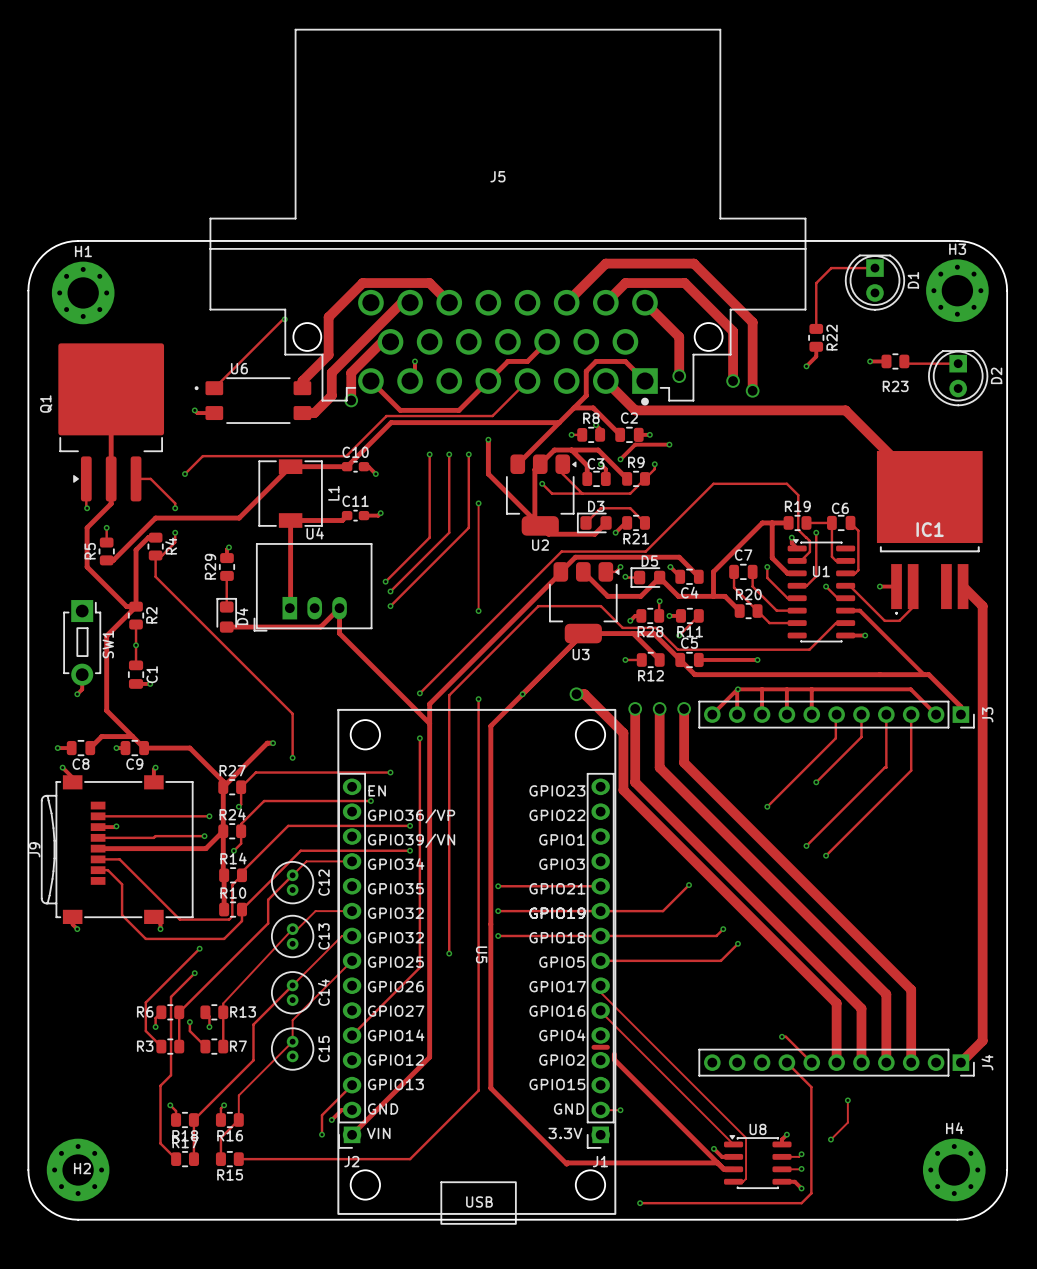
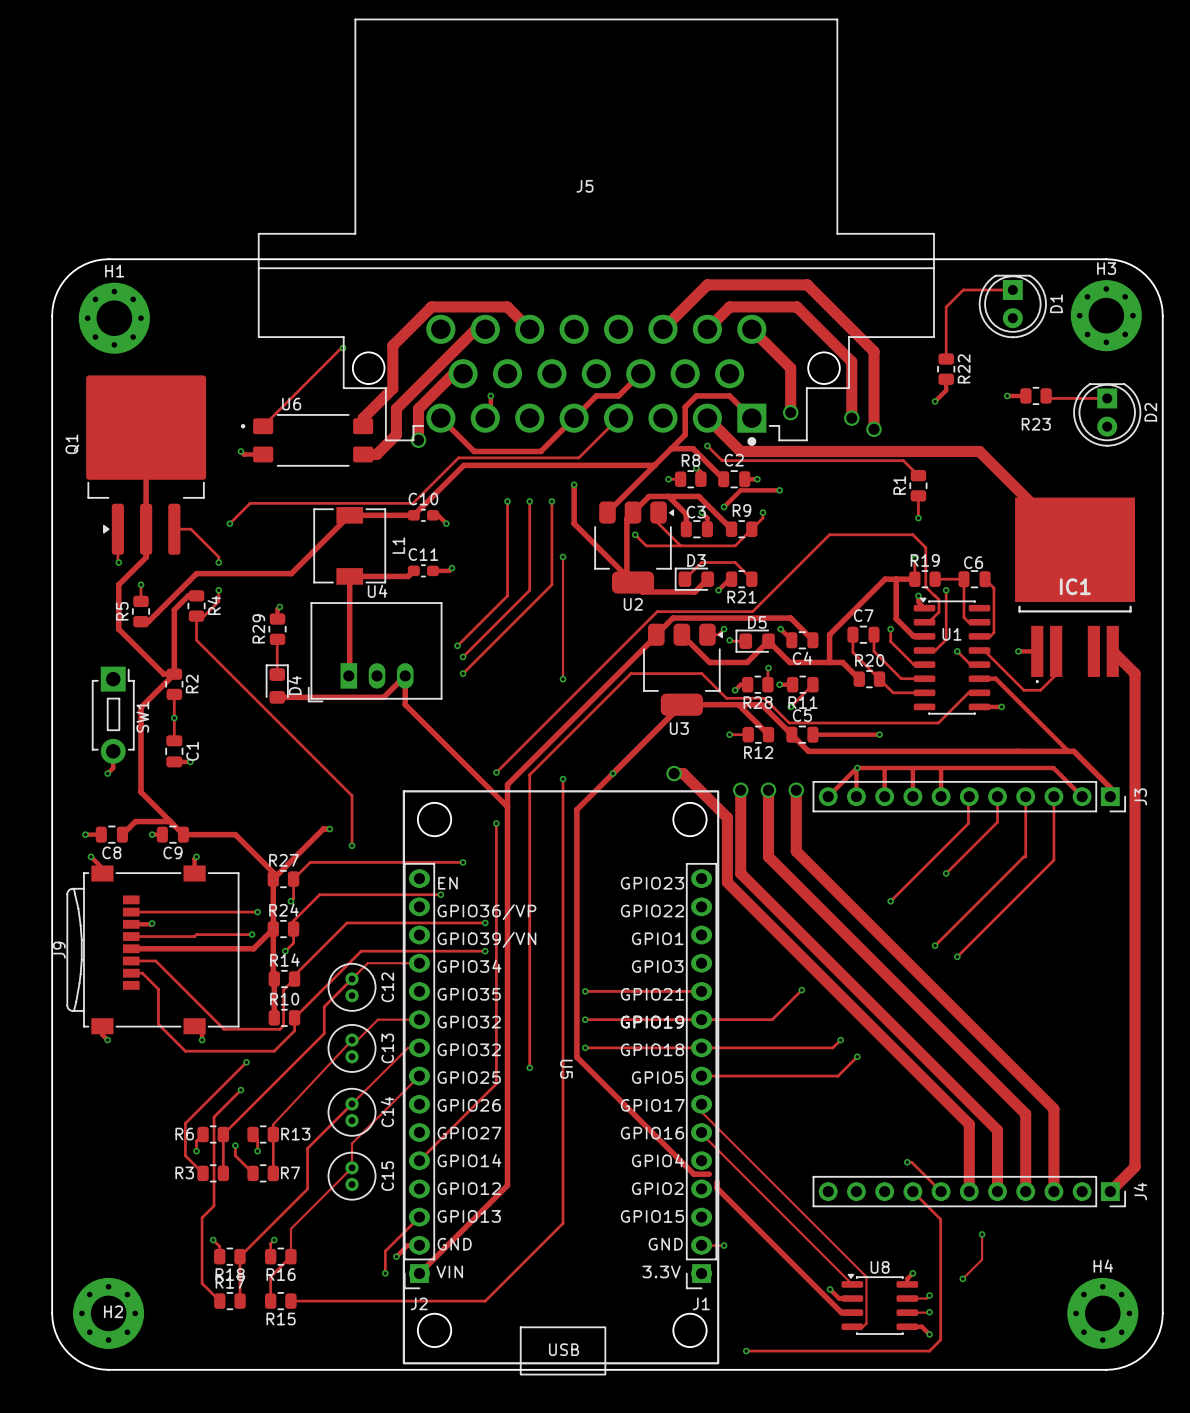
track: none -> (707, 445) (722, 460) (903, 460) (918, 475)
via: none -> (707, 445)
R1: none -> (918, 485)
track: none -> (918, 495) (918, 518)
via: none -> (918, 518)
track: none -> (914, 558) (914, 579)
via: none -> (914, 558)
track: (490, 944) (490, 1088) (566, 1164) (717, 1162) -> (576, 1057) (693, 1174)

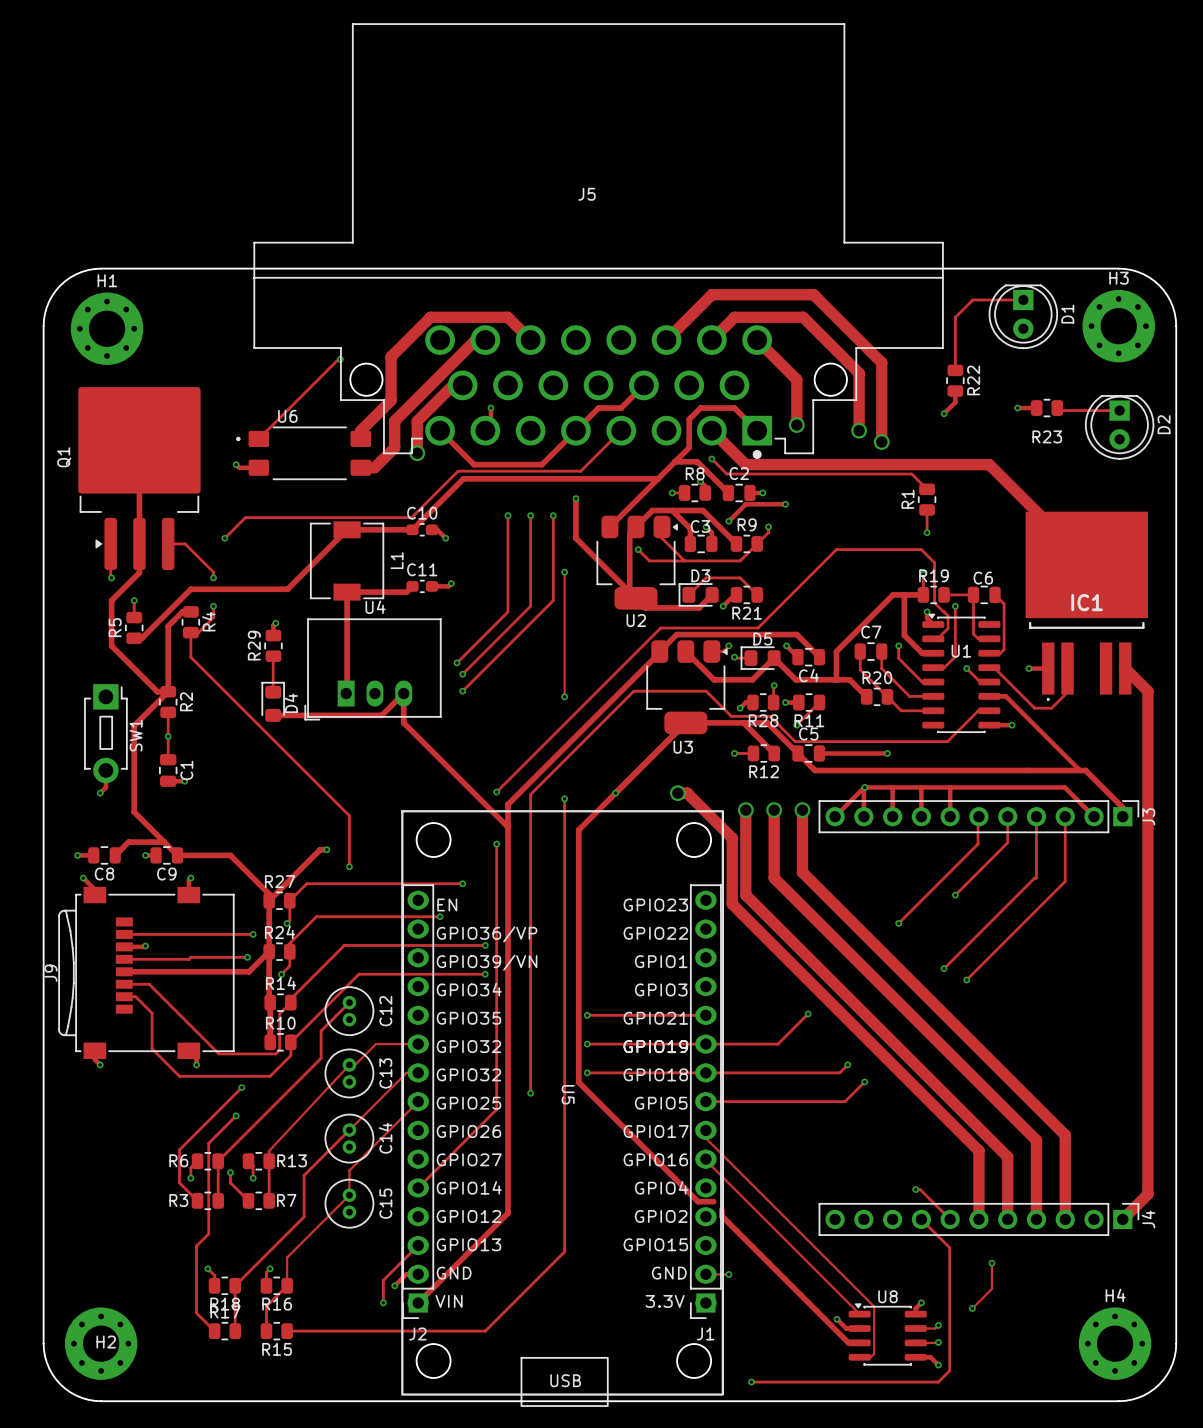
J3 footprint: [812, 781, 1126, 813] -> [818, 800, 1140, 833]
track: (419, 963) (367, 963) (352, 979) -> none
J4 footprint: [812, 1176, 1126, 1208] -> [818, 1203, 1140, 1236]

